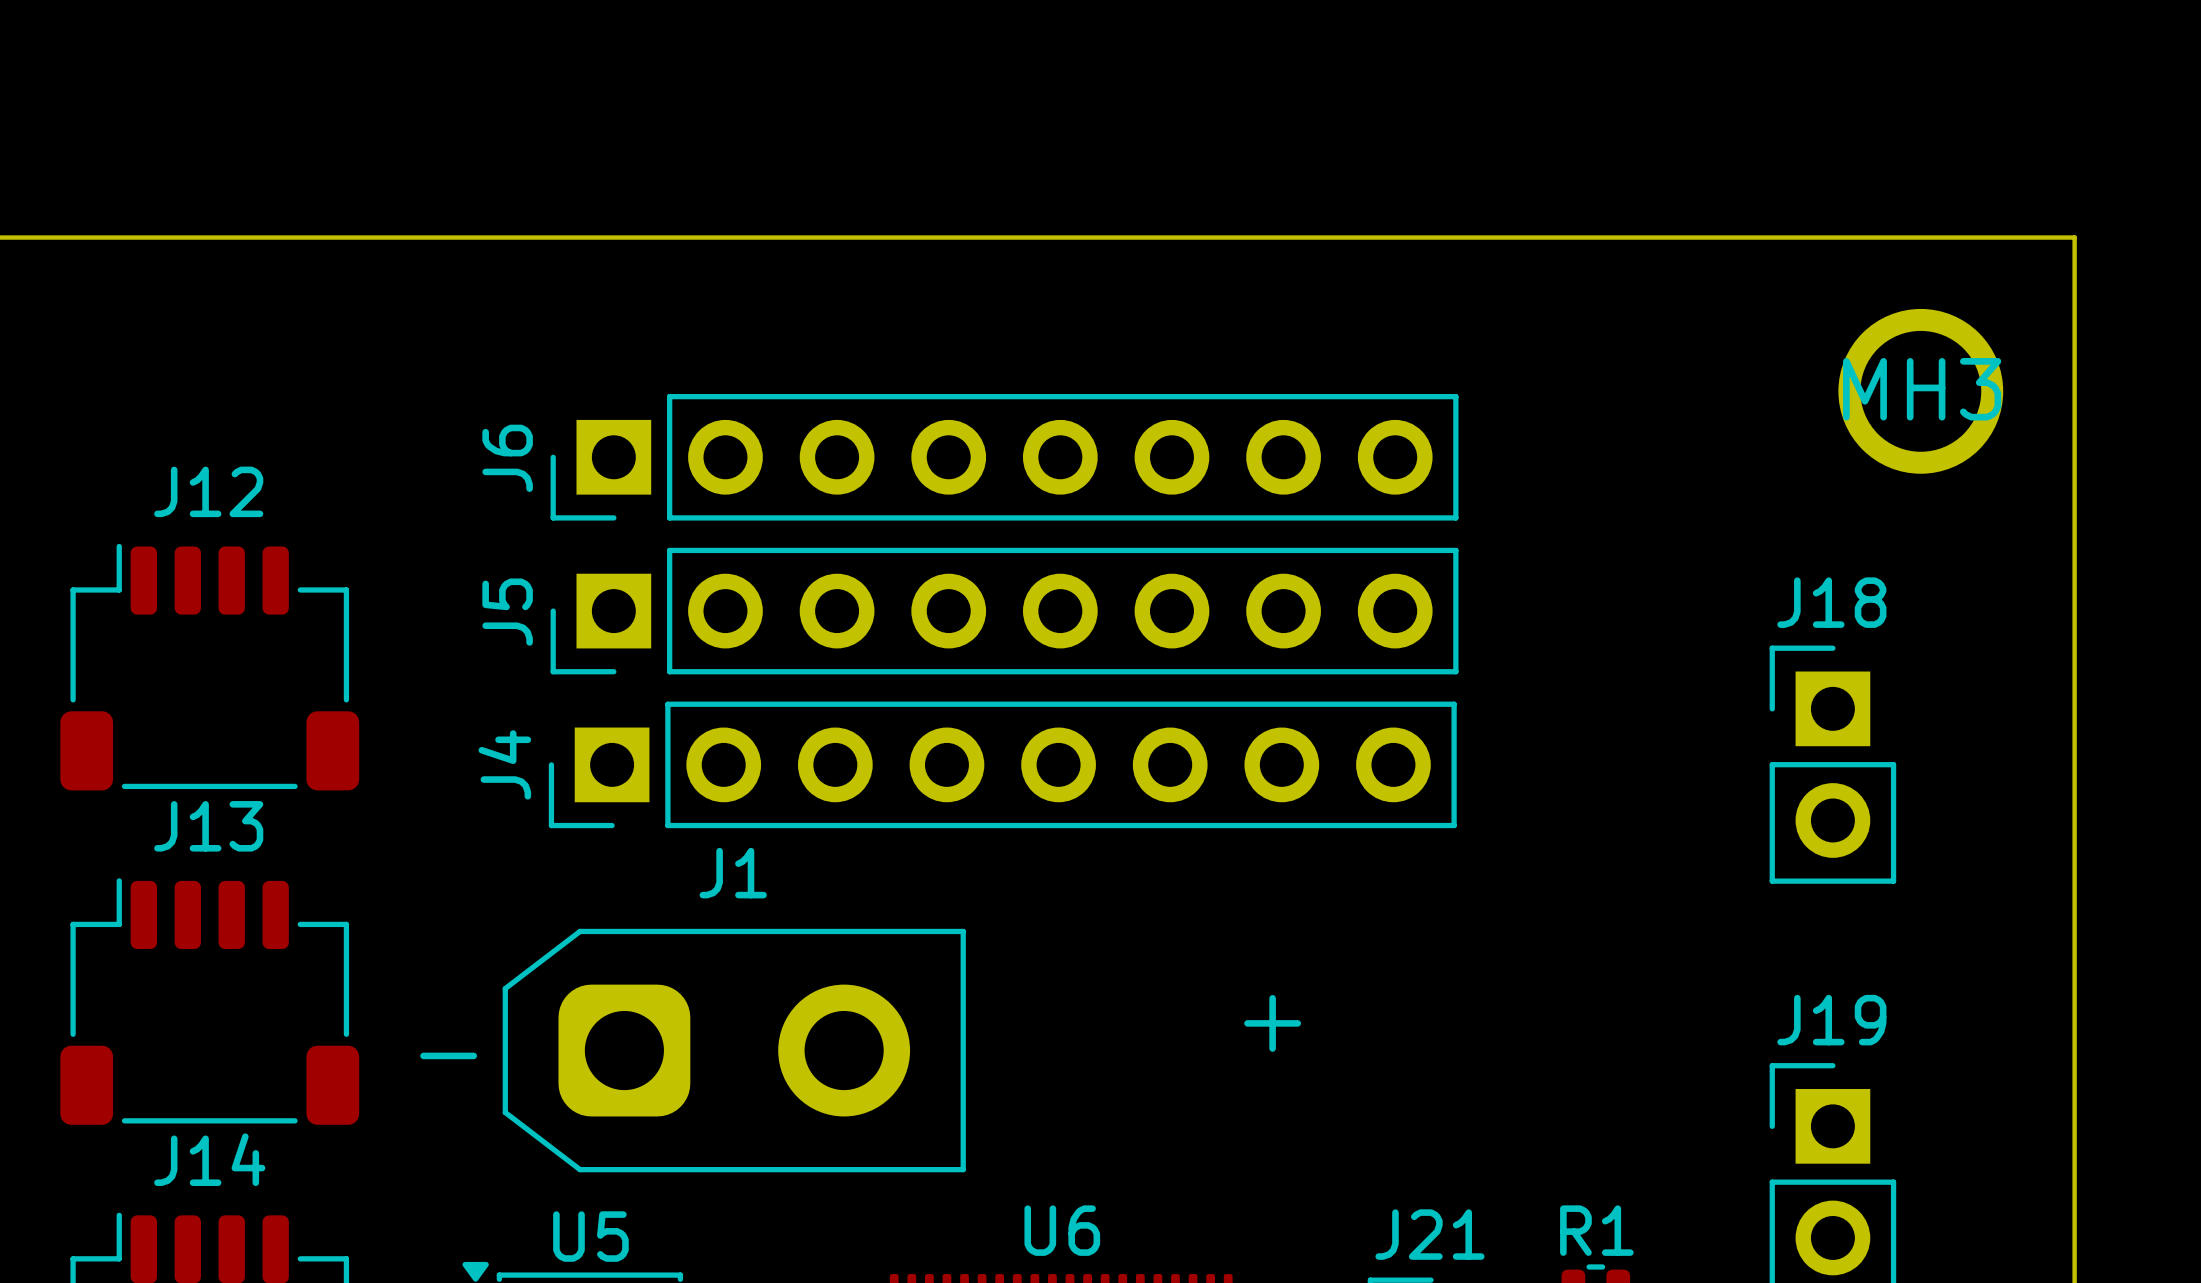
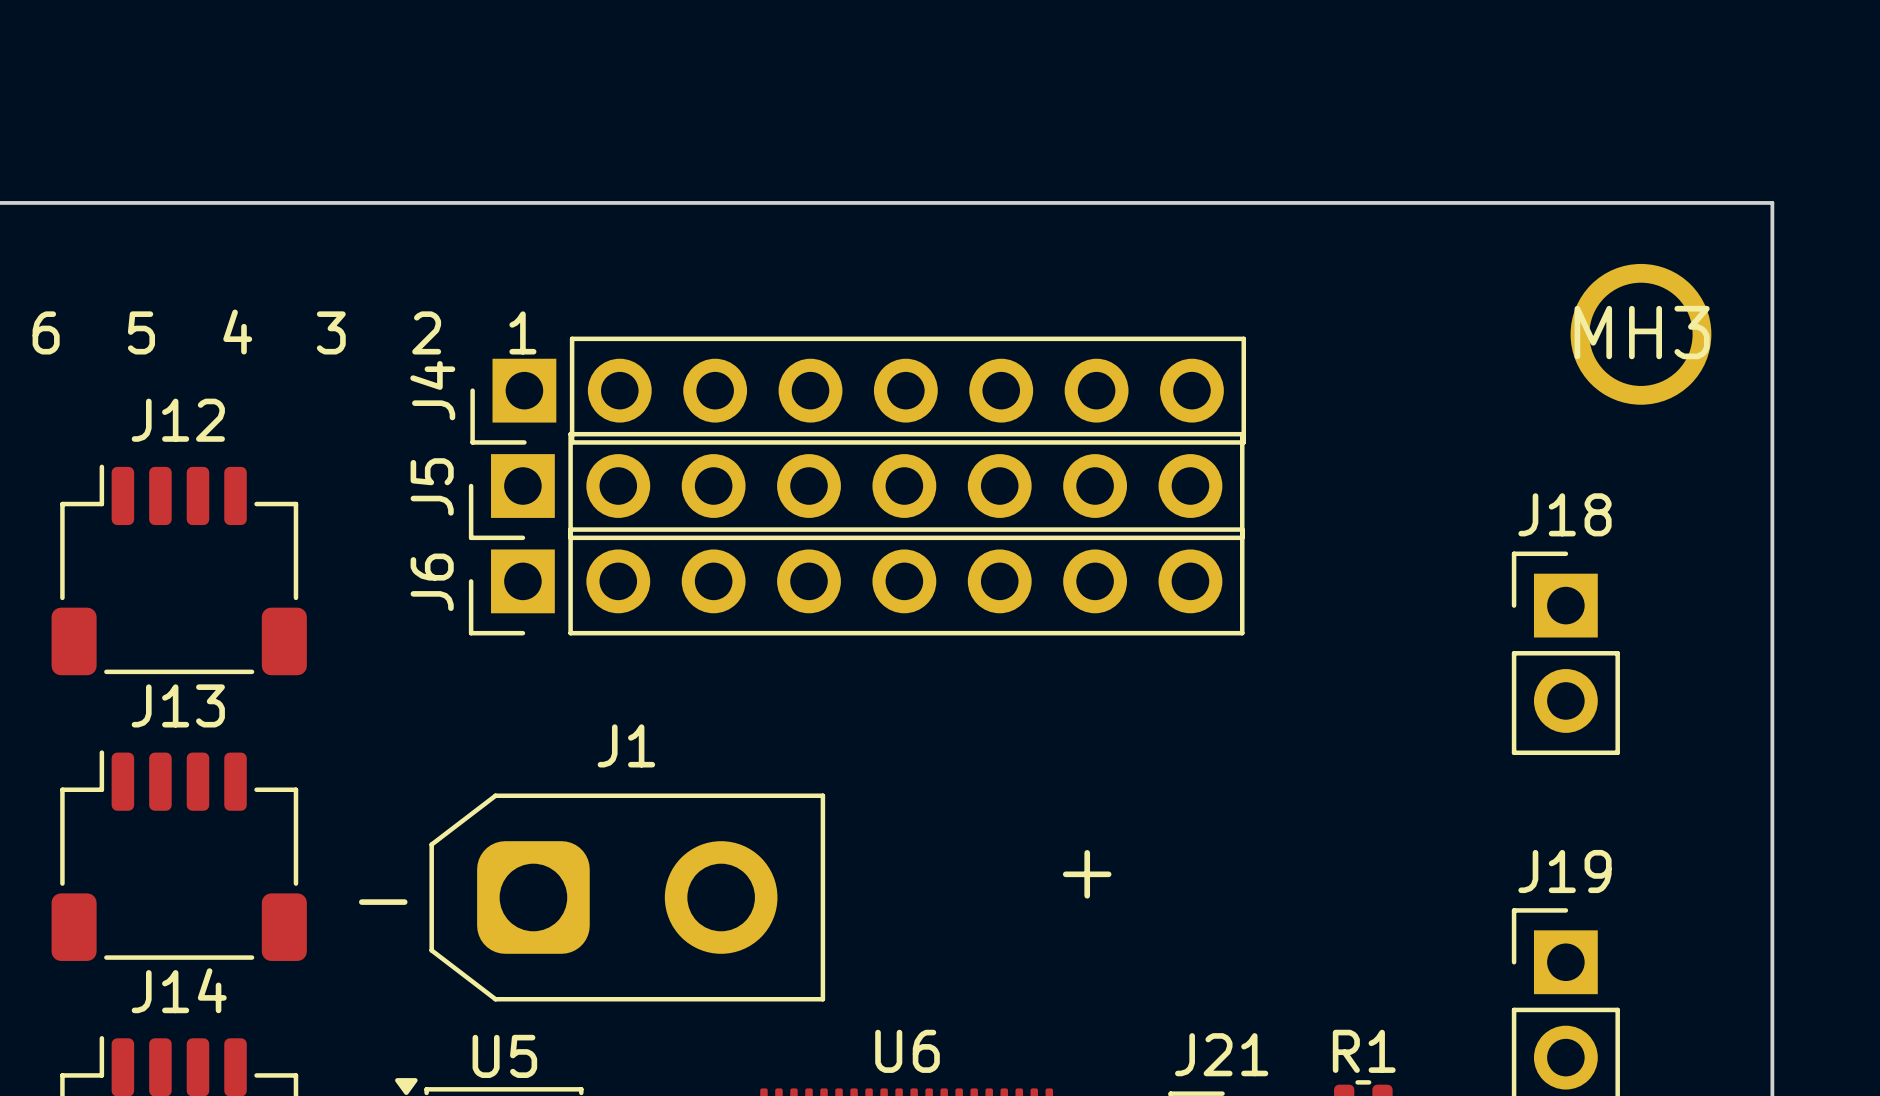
text: none -> 4 (237, 332)
text: none -> 6 (46, 332)
text: none -> 5 (141, 332)
text: none -> 3 (331, 332)
text: none -> 2 (426, 332)
text: none -> 1 (522, 332)
J6 name: J6 (507, 458) -> J4 (432, 390)
J5 position: (1004, 611) -> (856, 486)
J6: none -> (856, 581)
J4: (1002, 764) -> none

